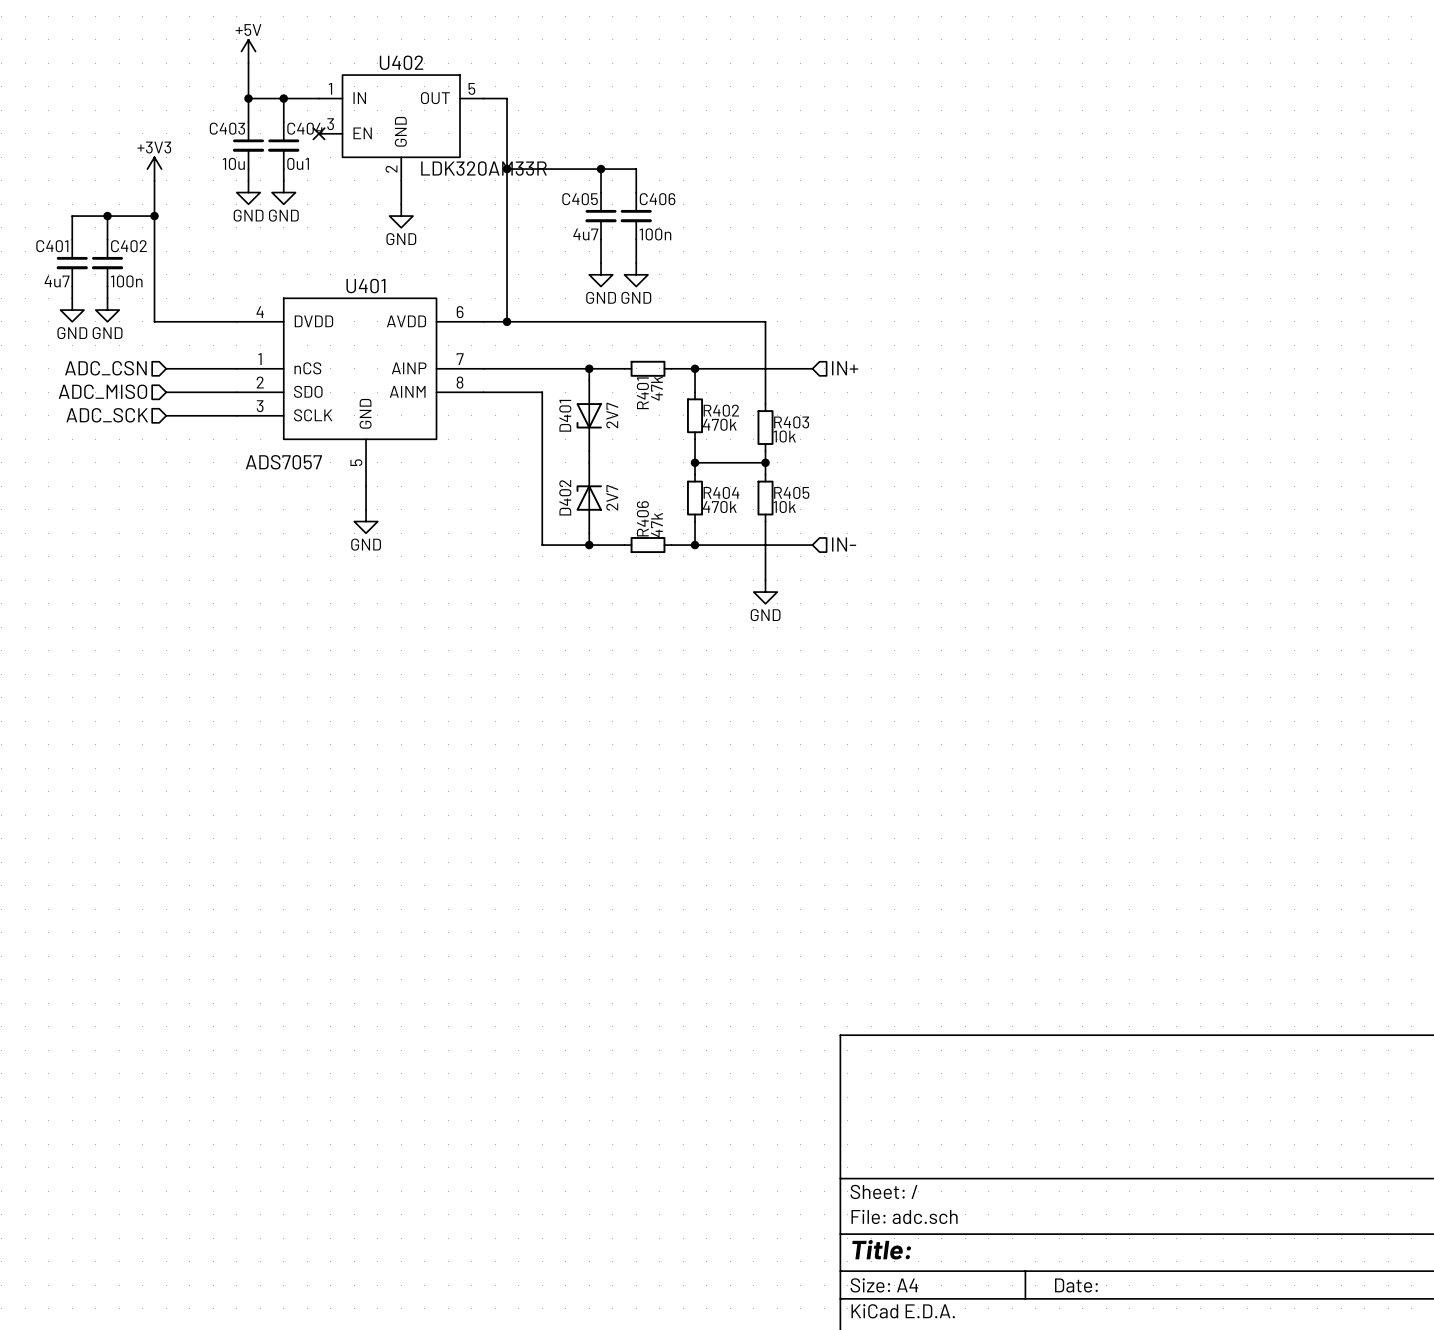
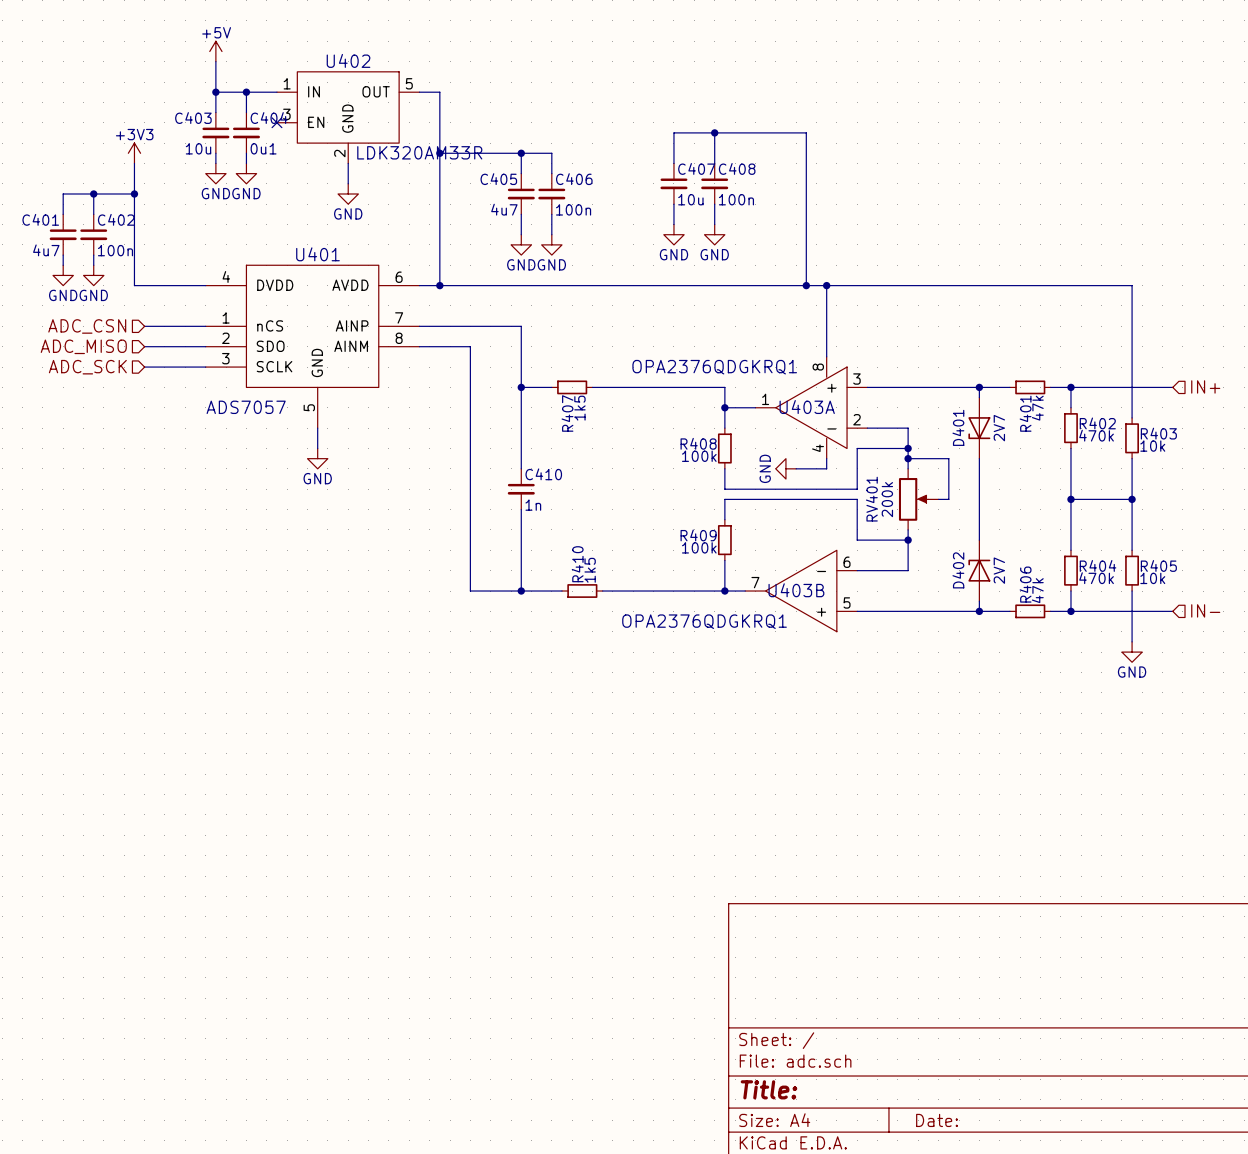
wire: none -> (714, 132) (714, 163)
junction: none -> (714, 132)
wire: none -> (673, 163) (673, 132) (806, 132) (806, 285)
C407: none -> 10u (673, 183)
C408: none -> 100n (714, 183)
power symbol: none -> GND (673, 234)
power symbol: none -> GND (714, 234)
wire: (765, 321) (765, 404) -> (663, 285) (1132, 285) (1132, 417)
junction: none -> (806, 285)
wire: none -> (826, 285) (826, 356)
junction: none -> (826, 285)
wire: (589, 368) (589, 380) -> none
junction: (589, 368) -> none
wire: (601, 368) (624, 368) -> (521, 326) (521, 468)
R401 position: (648, 368) -> (1030, 387)
wire: (671, 368) (812, 368) -> none
wire: (695, 368) (695, 392) -> (673, 204) (673, 224)
junction: (695, 368) -> none
hierarchical label: IN+ (845, 368) -> none
D401 position: (589, 415) -> (979, 428)
R402 position: (695, 415) -> (1070, 428)
R403 position: (765, 427) -> (1132, 438)
hierarchical label: none -> IN+ (1205, 386)
wire: none -> (521, 387) (551, 387)
junction: none -> (521, 387)
R407: none -> 1k5 (572, 387)
wire: none -> (592, 387) (724, 387) (724, 428)
wire: (695, 439) (695, 474) -> none
wire: none -> (867, 387) (1009, 387)
wire: none -> (979, 387) (979, 397)
junction: none -> (979, 387)
wire: none -> (1050, 387) (1172, 387)
wire: none -> (1070, 387) (1070, 407)
junction: none -> (1070, 387)
wire: (589, 451) (589, 462) -> none
wire: (765, 451) (765, 474) -> (714, 204) (714, 224)
wire: (695, 462) (765, 462) -> none
junction: (695, 462) -> none
junction: (765, 462) -> none
wire: none -> (724, 407) (755, 407)
junction: none -> (724, 407)
U403A: none -> OPA2376QDGKRQ1 (811, 407)
wire: none -> (867, 428) (908, 428) (908, 468)
D402 position: (589, 498) -> (979, 570)
R404 position: (695, 498) -> (1070, 570)
R405 position: (765, 498) -> (1132, 570)
R408: none -> 100k (724, 448)
wire: none -> (908, 448) (857, 448) (857, 489) (724, 489) (724, 468)
junction: none -> (908, 448)
wire: none -> (1070, 448) (1070, 550)
wire: (695, 521) (695, 545) -> none
wire: (765, 521) (765, 580) -> none
wire: none -> (826, 458) (826, 468) (796, 468)
wire: none -> (908, 458) (948, 458) (948, 499) (938, 499)
junction: none -> (908, 458)
wire: none -> (979, 458) (979, 540)
wire: none -> (1132, 458) (1132, 550)
wire: (589, 533) (589, 545) -> none
hierarchical label: IN- (844, 544) -> none
wire: (542, 545) (624, 545) -> (470, 479) (470, 591) (562, 591)
junction: (589, 545) -> none
R406 position: (648, 545) -> (1030, 611)
wire: (671, 545) (812, 545) -> none
junction: (695, 545) -> none
C410: none -> 1n (521, 489)
RV401: none -> 200k (918, 499)
wire: none -> (1070, 499) (1132, 499)
junction: none -> (1070, 499)
junction: none -> (1132, 499)
wire: none -> (521, 509) (521, 591)
power symbol rotation: 0° (765, 592) -> 90° clockwise (785, 468)
power symbol position: GND (765, 592) -> GND (785, 468)
wire: none -> (724, 519) (724, 499) (857, 499) (857, 540) (908, 540)
wire: none -> (908, 529) (908, 570) (857, 570)
R409: none -> 100k (724, 540)
junction: none -> (908, 540)
wire: none -> (724, 560) (724, 591)
junction: none -> (521, 591)
R410: none -> 1k5 (582, 591)
wire: none -> (602, 591) (745, 591)
junction: none -> (724, 591)
U403B: none -> OPA2376QDGKRQ1 (801, 591)
wire: none -> (1070, 591) (1070, 611)
wire: none -> (1132, 591) (1132, 641)
wire: none -> (979, 601) (979, 611)
wire: none -> (857, 611) (1009, 611)
junction: none -> (979, 611)
wire: none -> (1050, 611) (1172, 611)
junction: none -> (1070, 611)
hierarchical label: none -> IN- (1205, 610)
power symbol: none -> GND (1132, 652)

